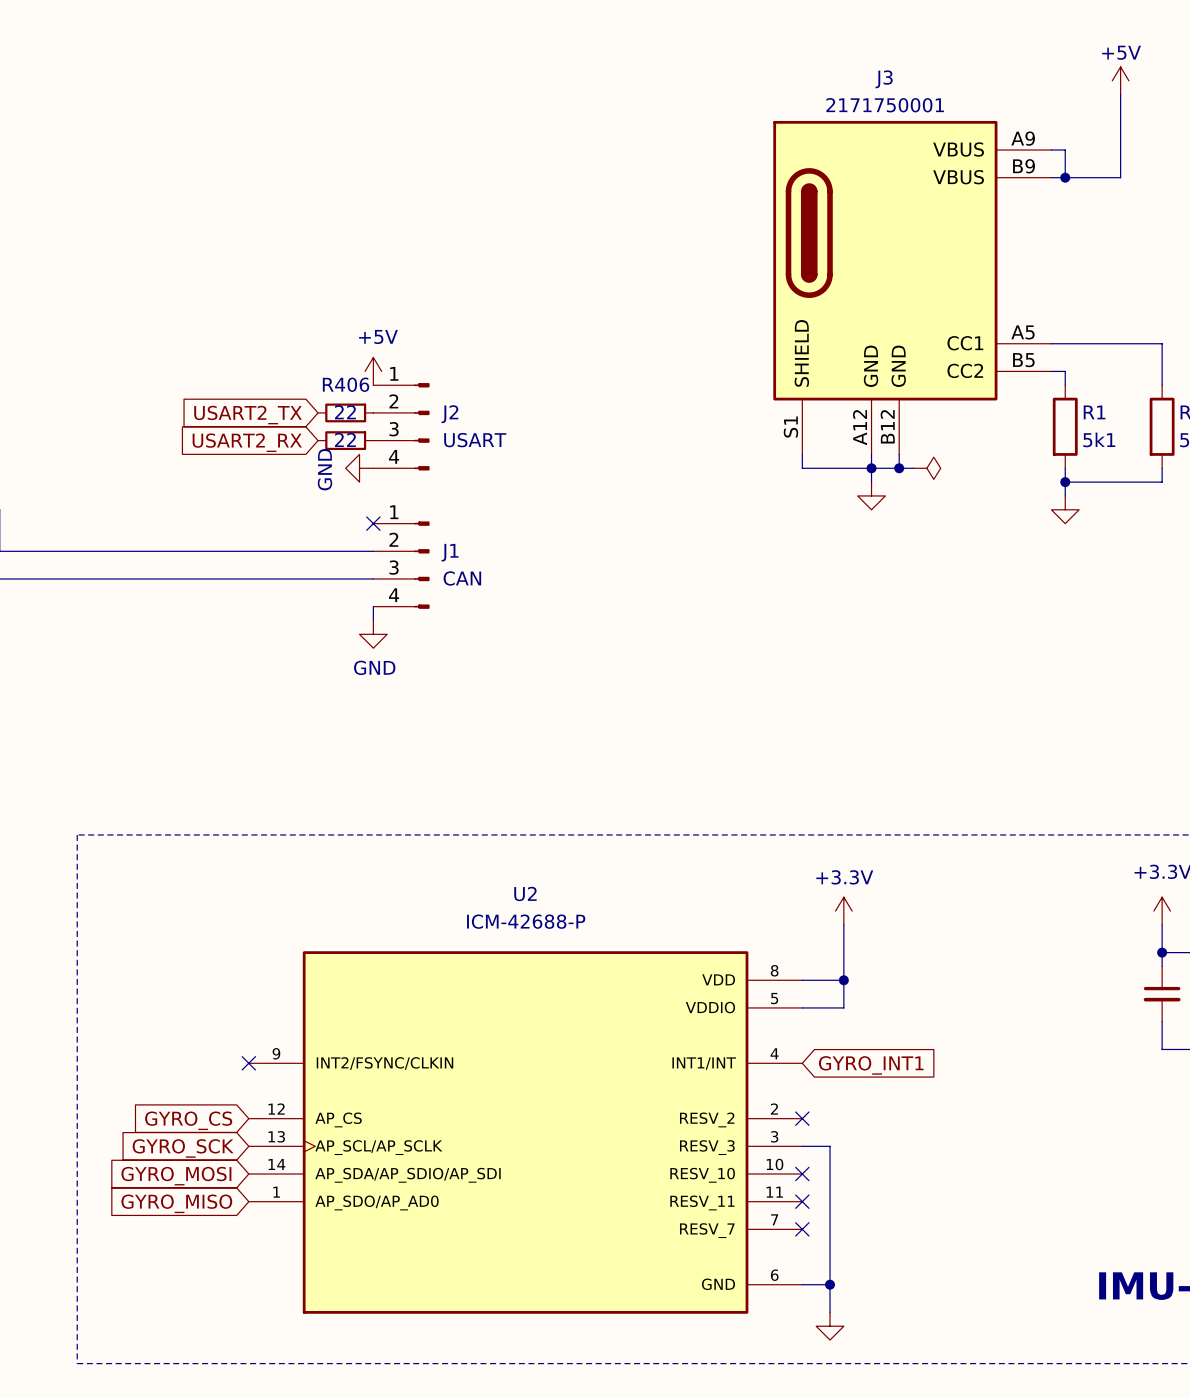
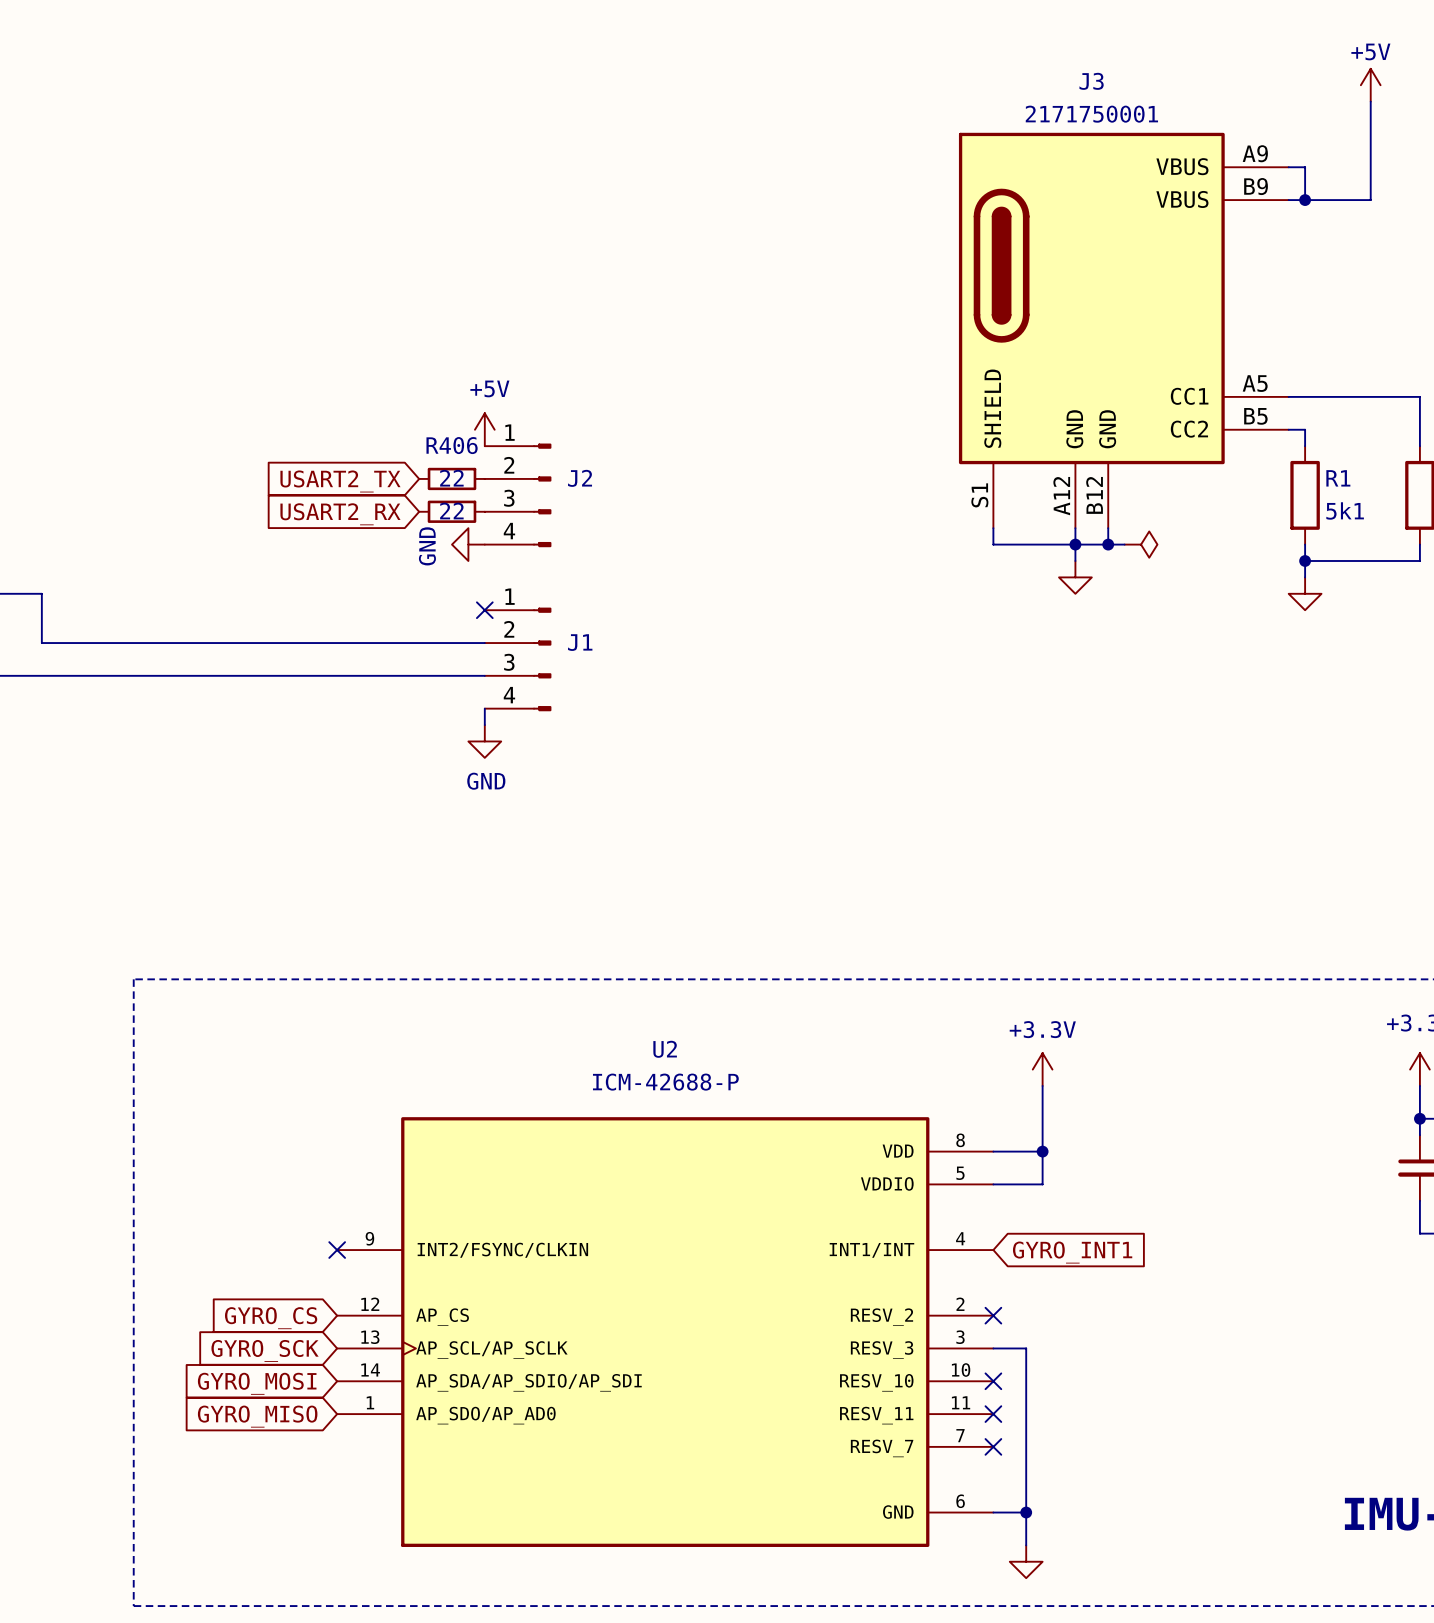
J2 value: USART (475, 440) -> none
J1 value: CAN (462, 578) -> none

